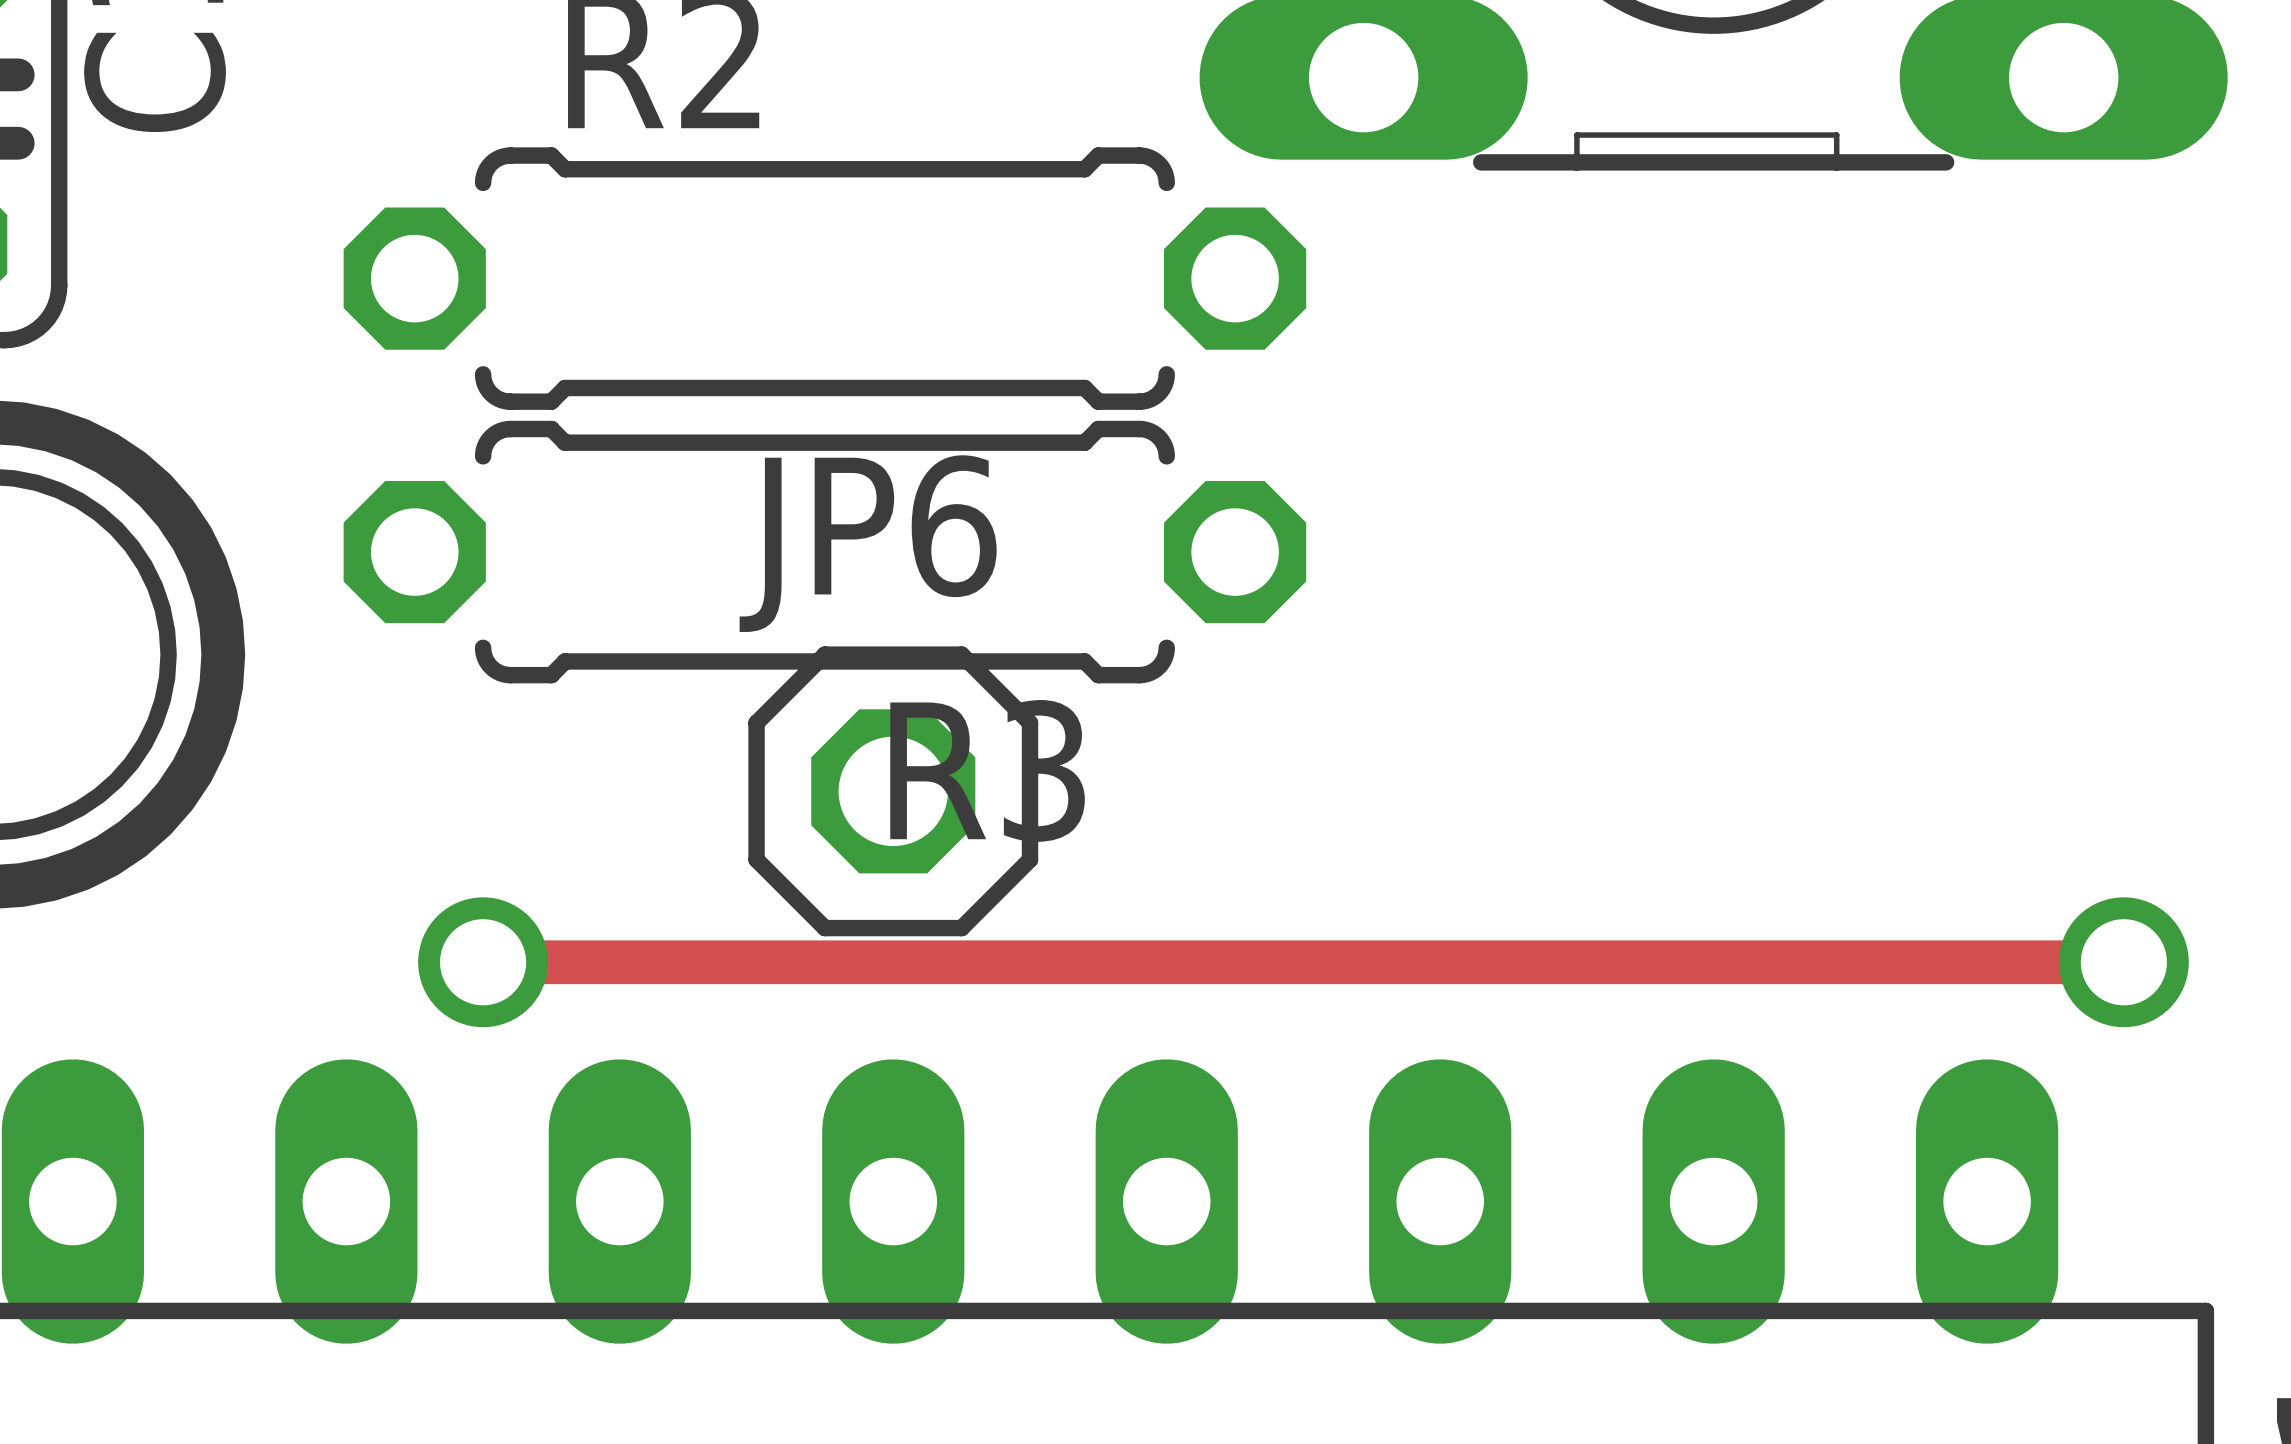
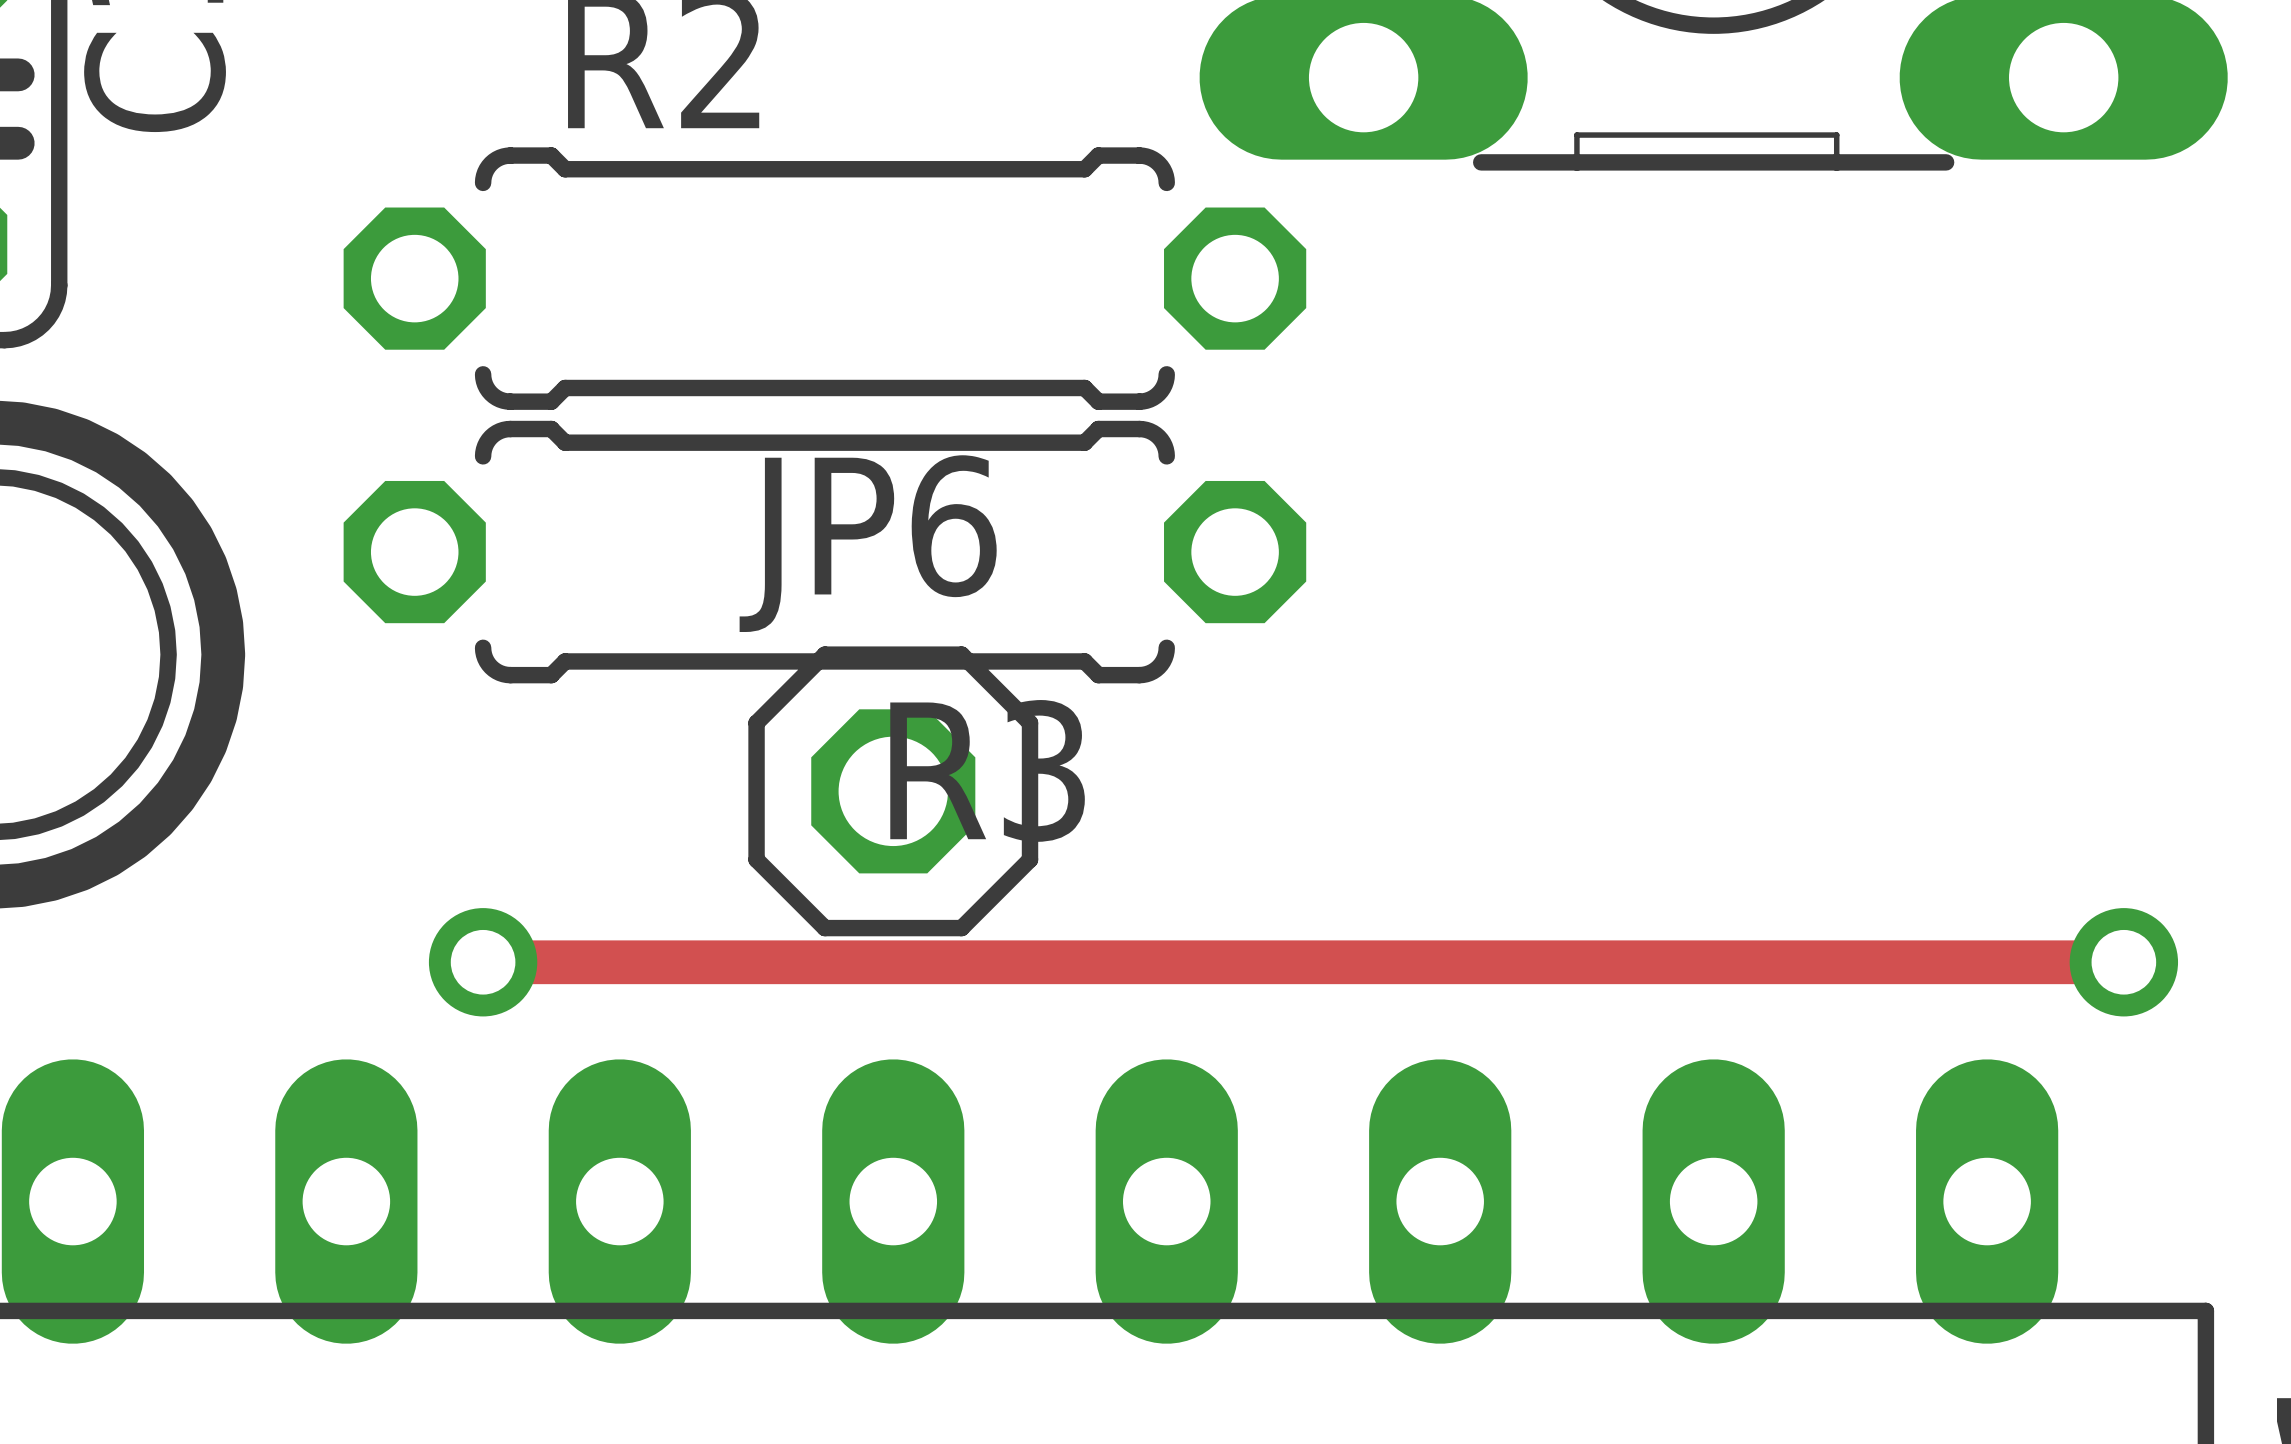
via size: [418, 897, 549, 1028] -> [428, 908, 538, 1017]
via size: [2058, 897, 2189, 1028] -> [2069, 908, 2179, 1017]

